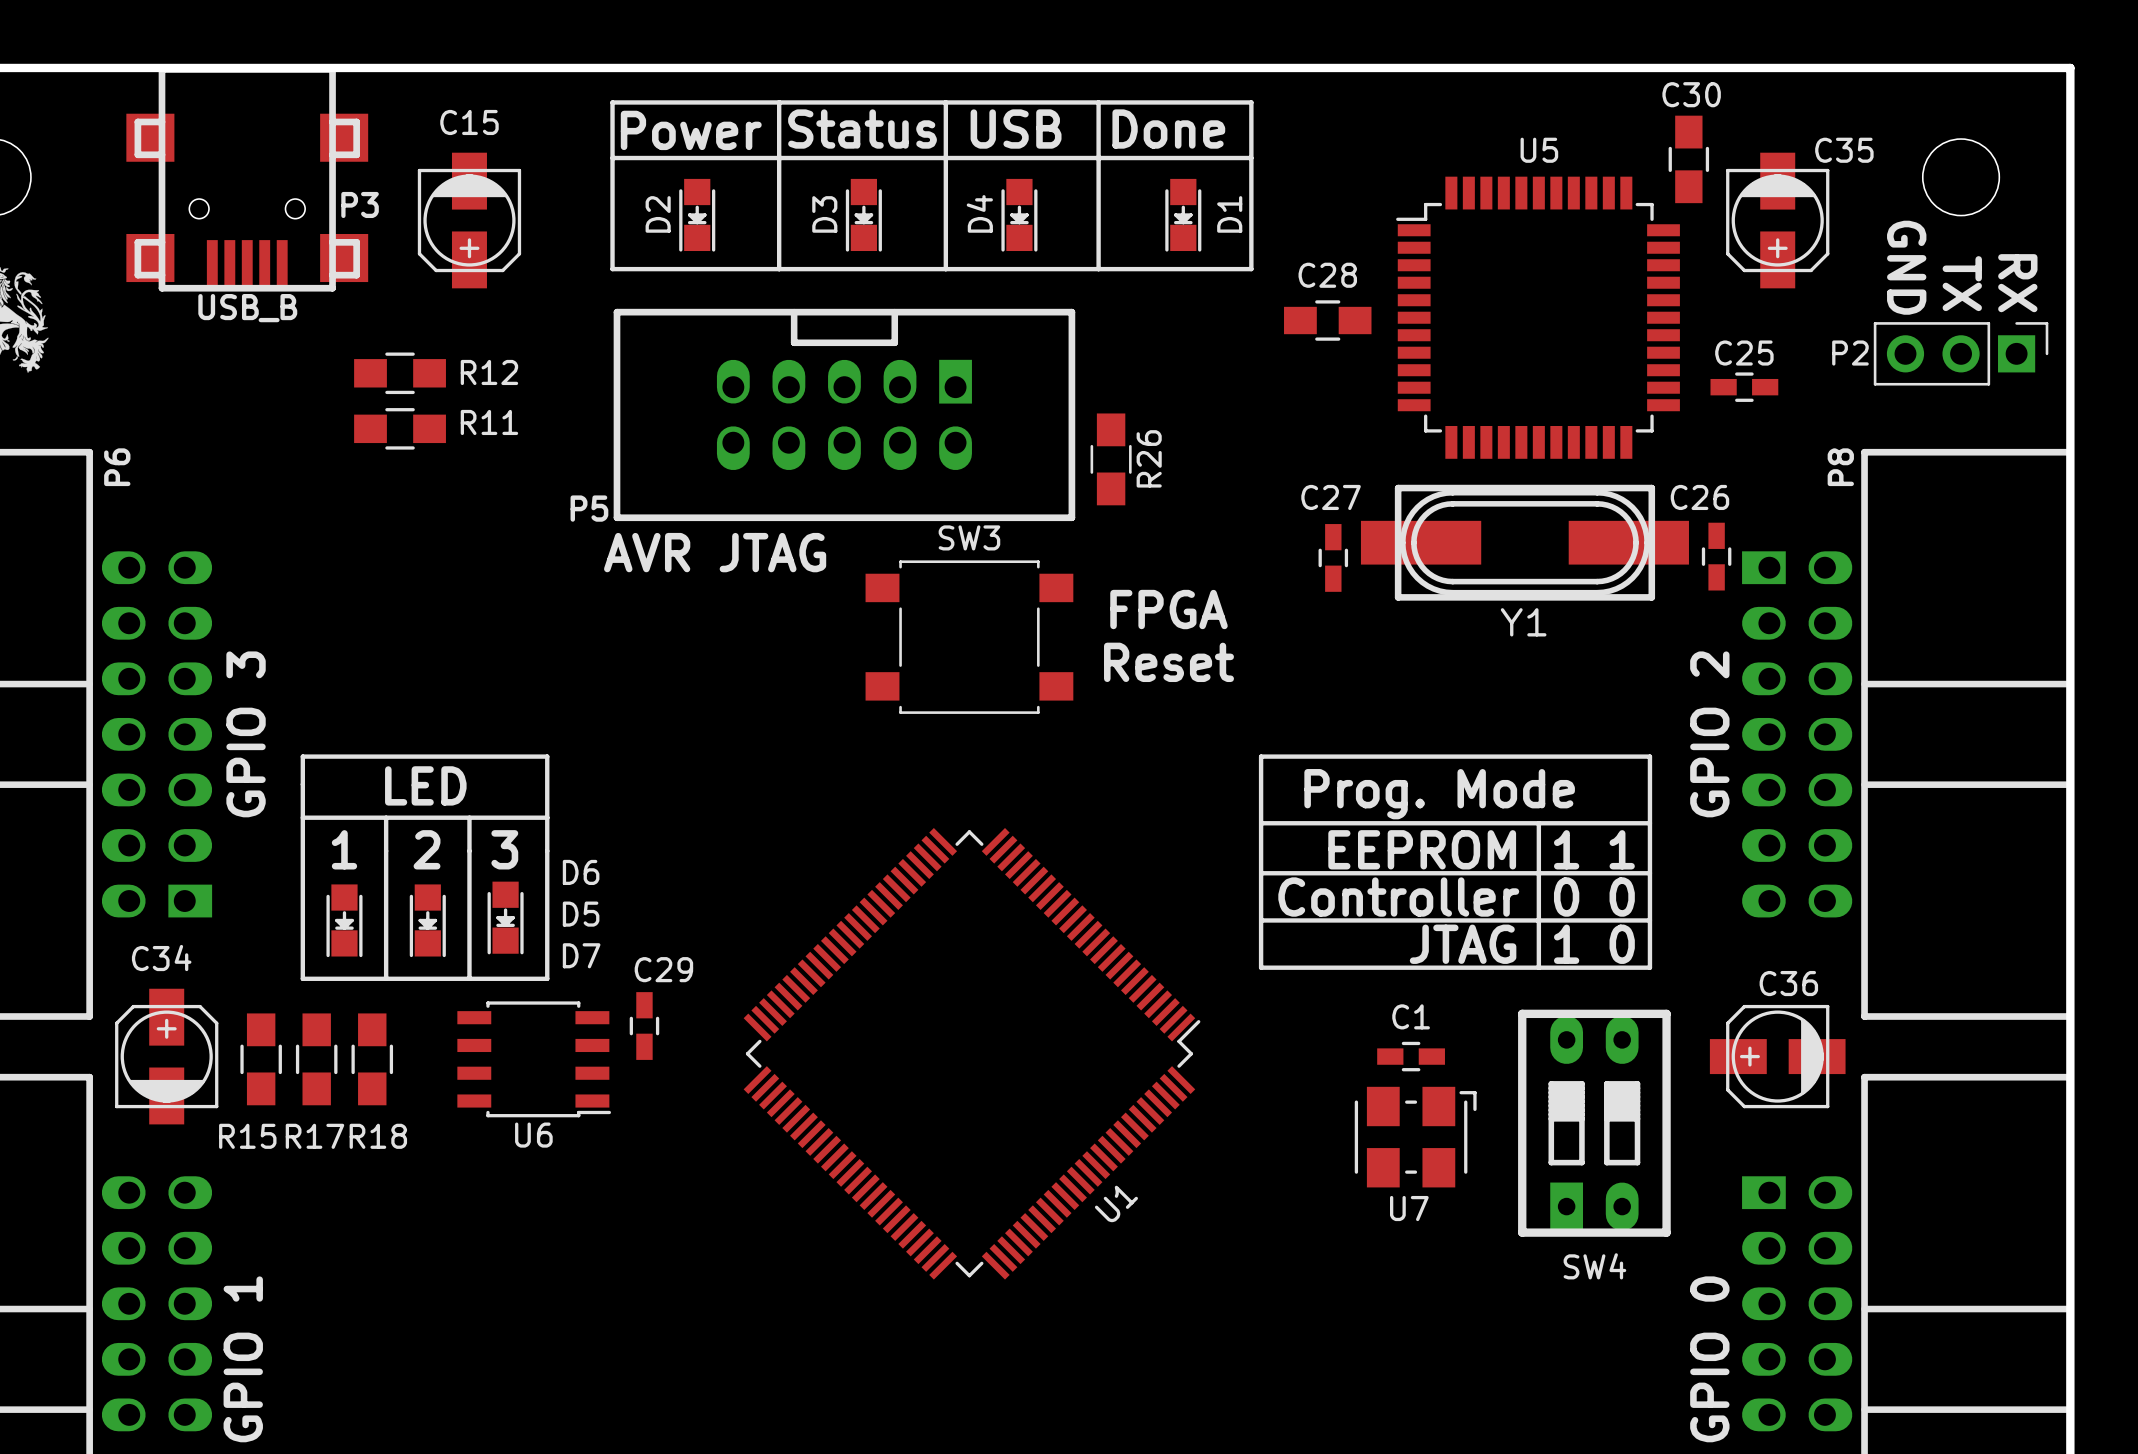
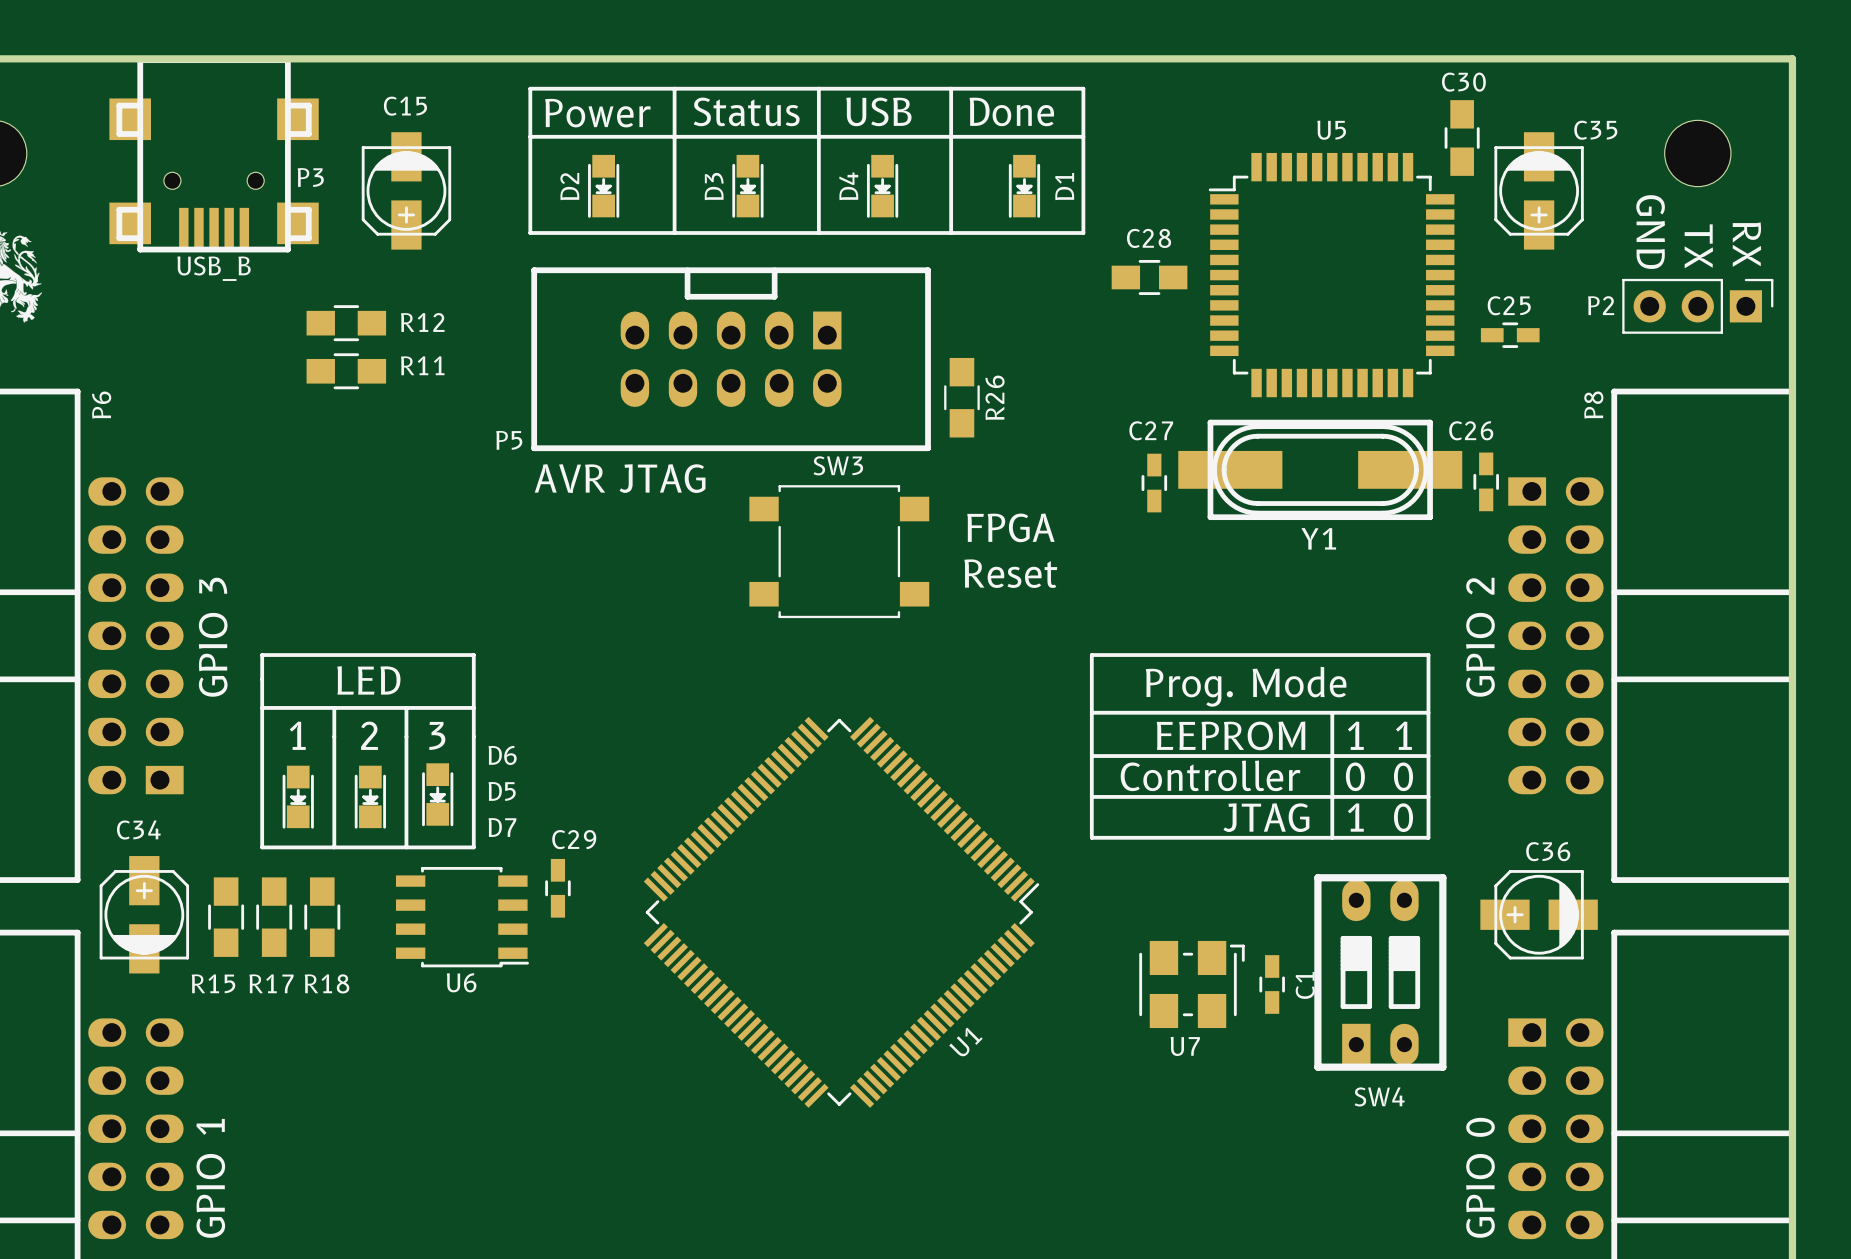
C1 rotation: 0° (1411, 1056) -> 90° clockwise (1272, 984)
C1 position: (1411, 1056) -> (1272, 984)
U7 position: (1415, 1137) -> (1191, 984)

